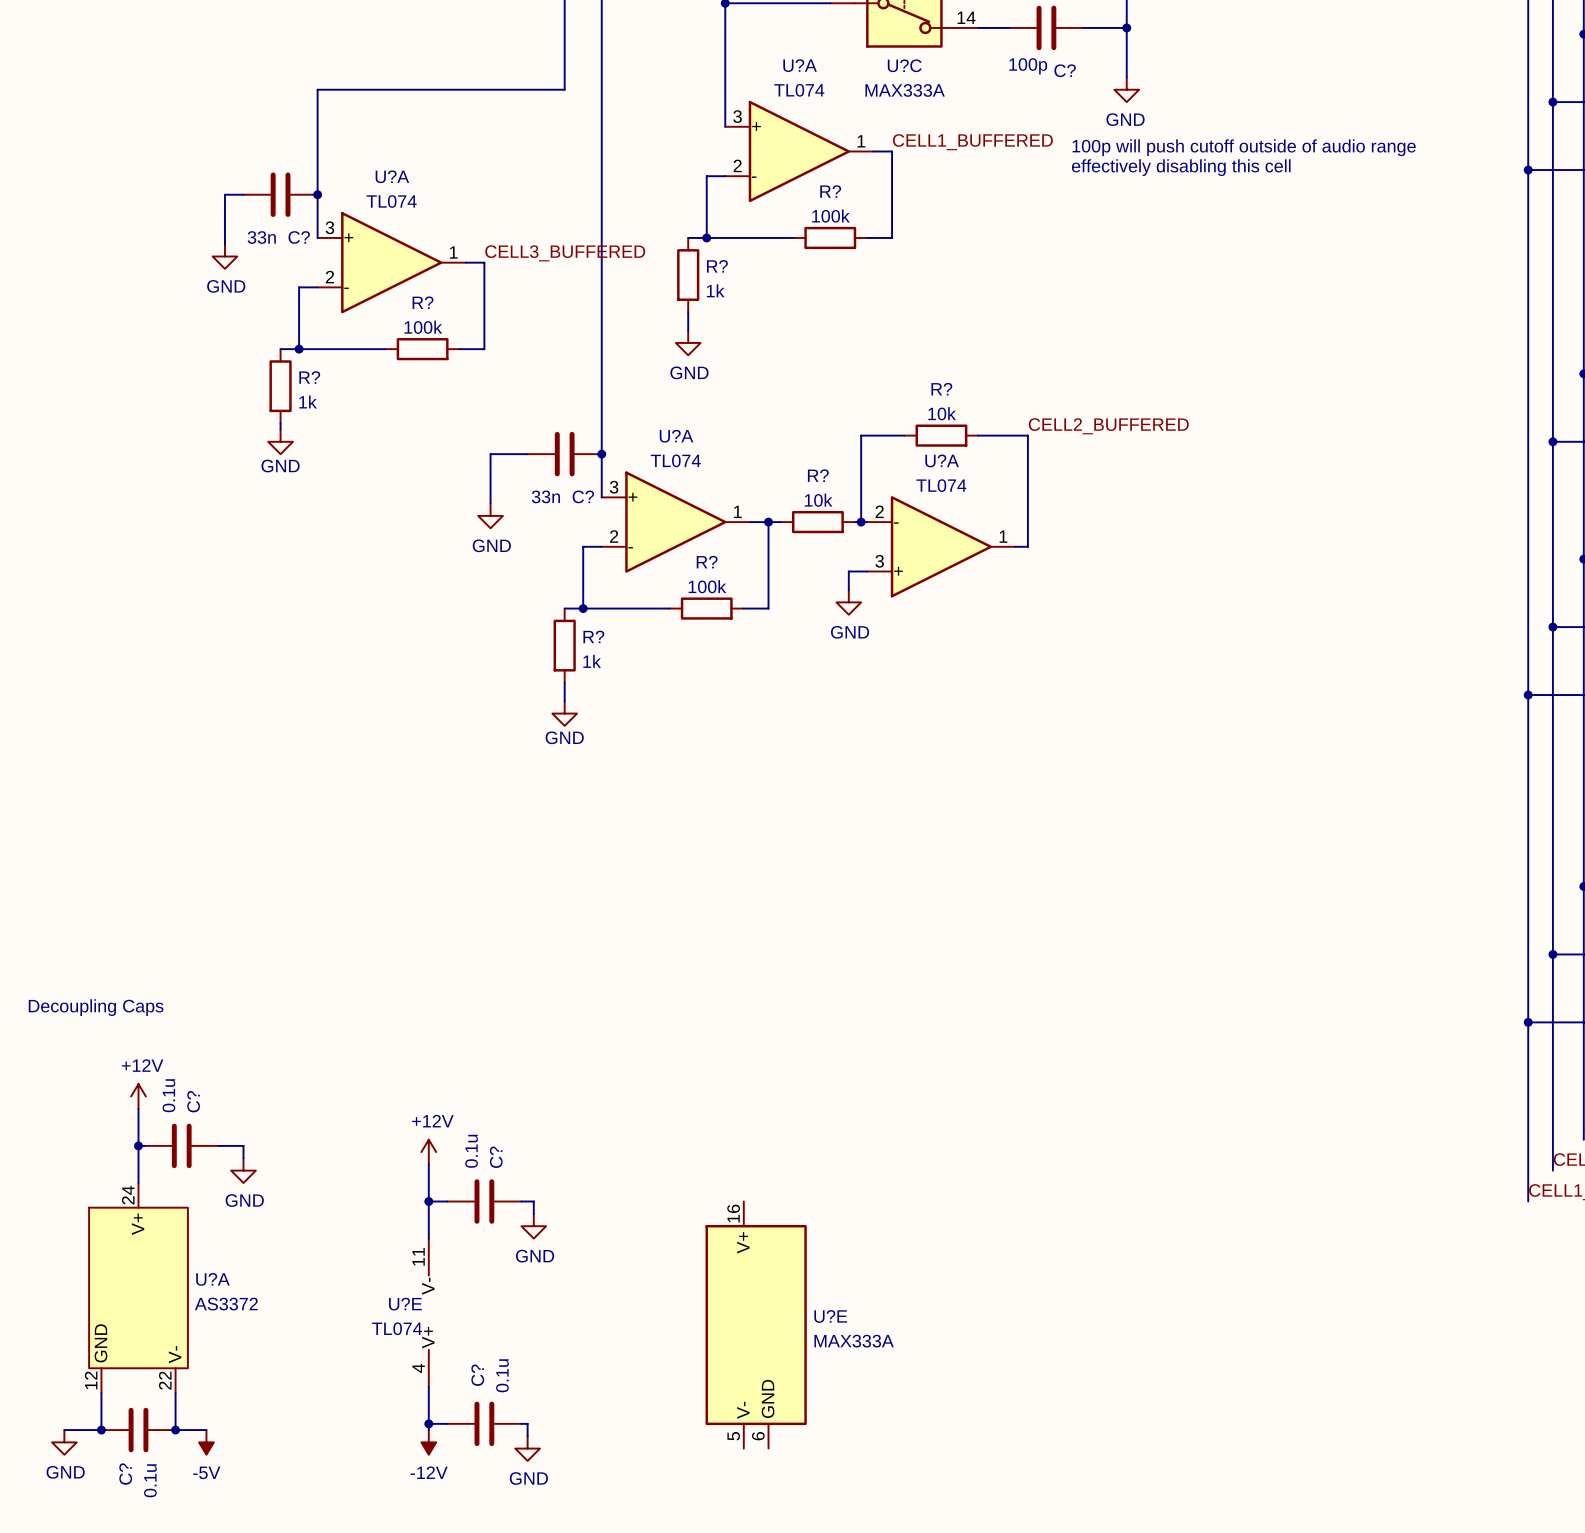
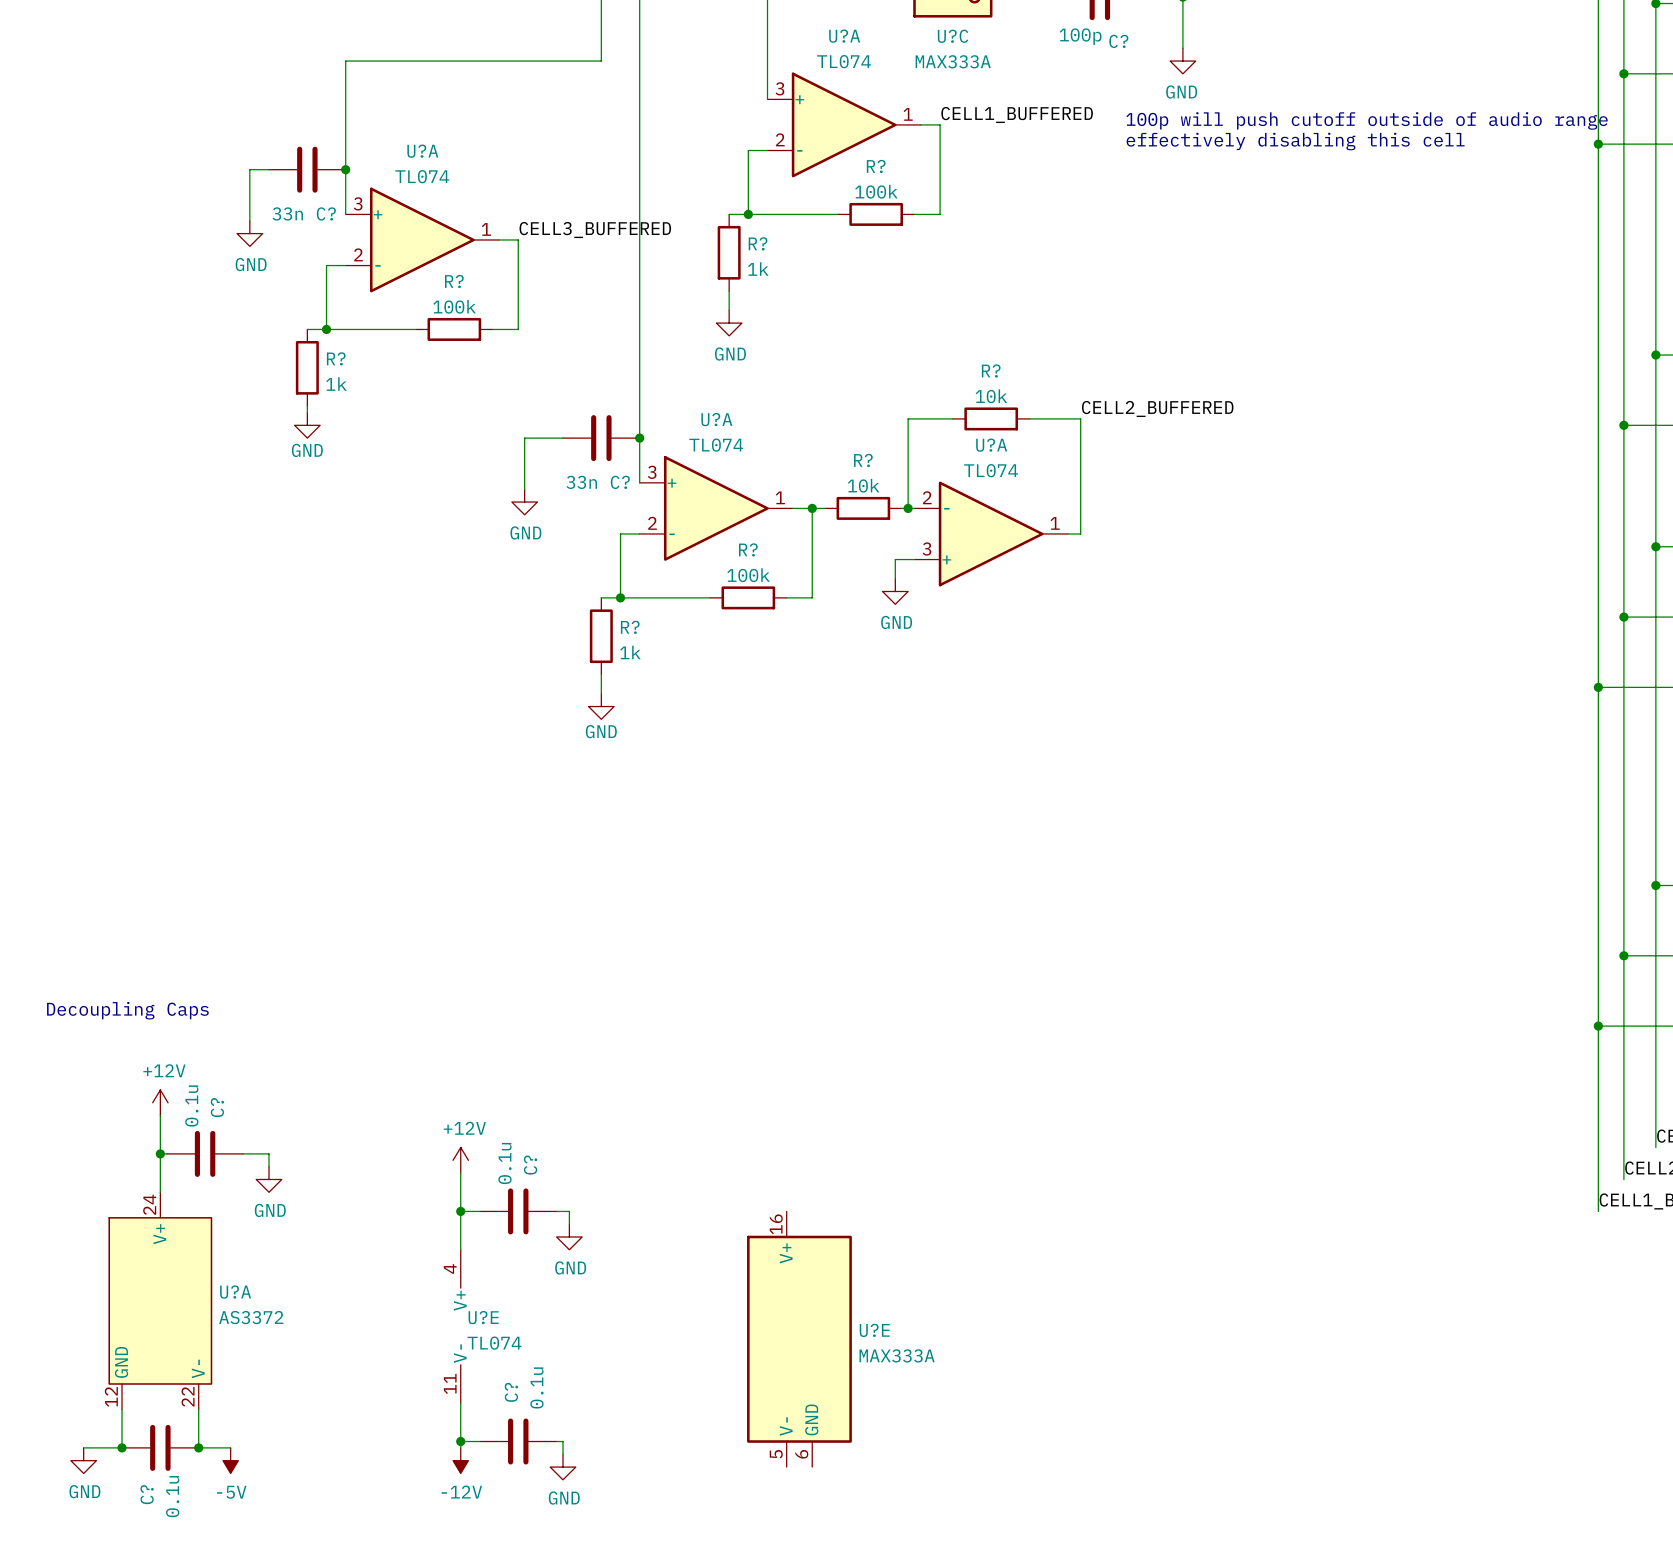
U?E rotation: 0° (428, 1312) -> 180° (460, 1326)
U?E value position: TL074 (397, 1328) -> TL074 (494, 1343)

